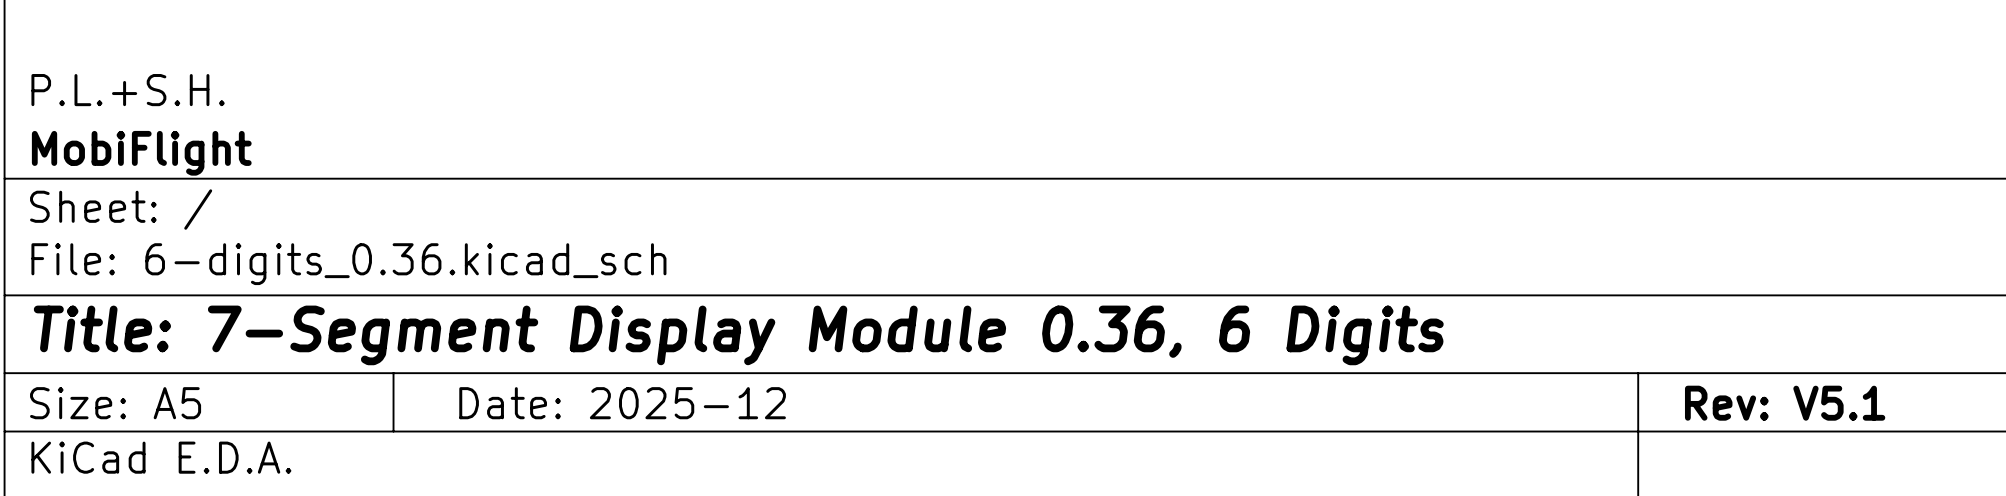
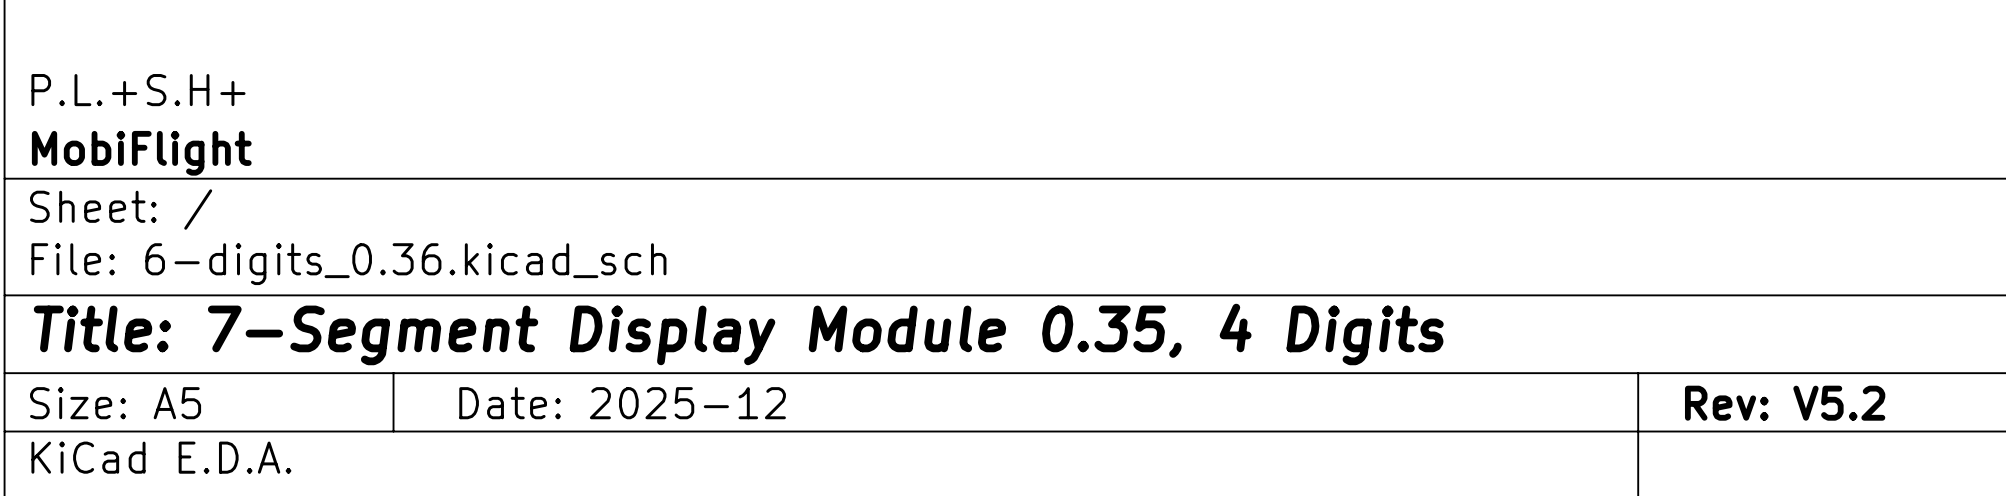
title block: P.L.+S.H. (128, 90) -> P.L.+S.H+ (138, 90)
title block: Title: 7-Segment Display Module 0.36, 6 Digits (738, 335) -> Title: 7-Segment Display Module 0.35, 4 Digits (738, 334)
title block: Rev: V5.1 (1785, 403) -> Rev: V5.2 (1785, 403)

